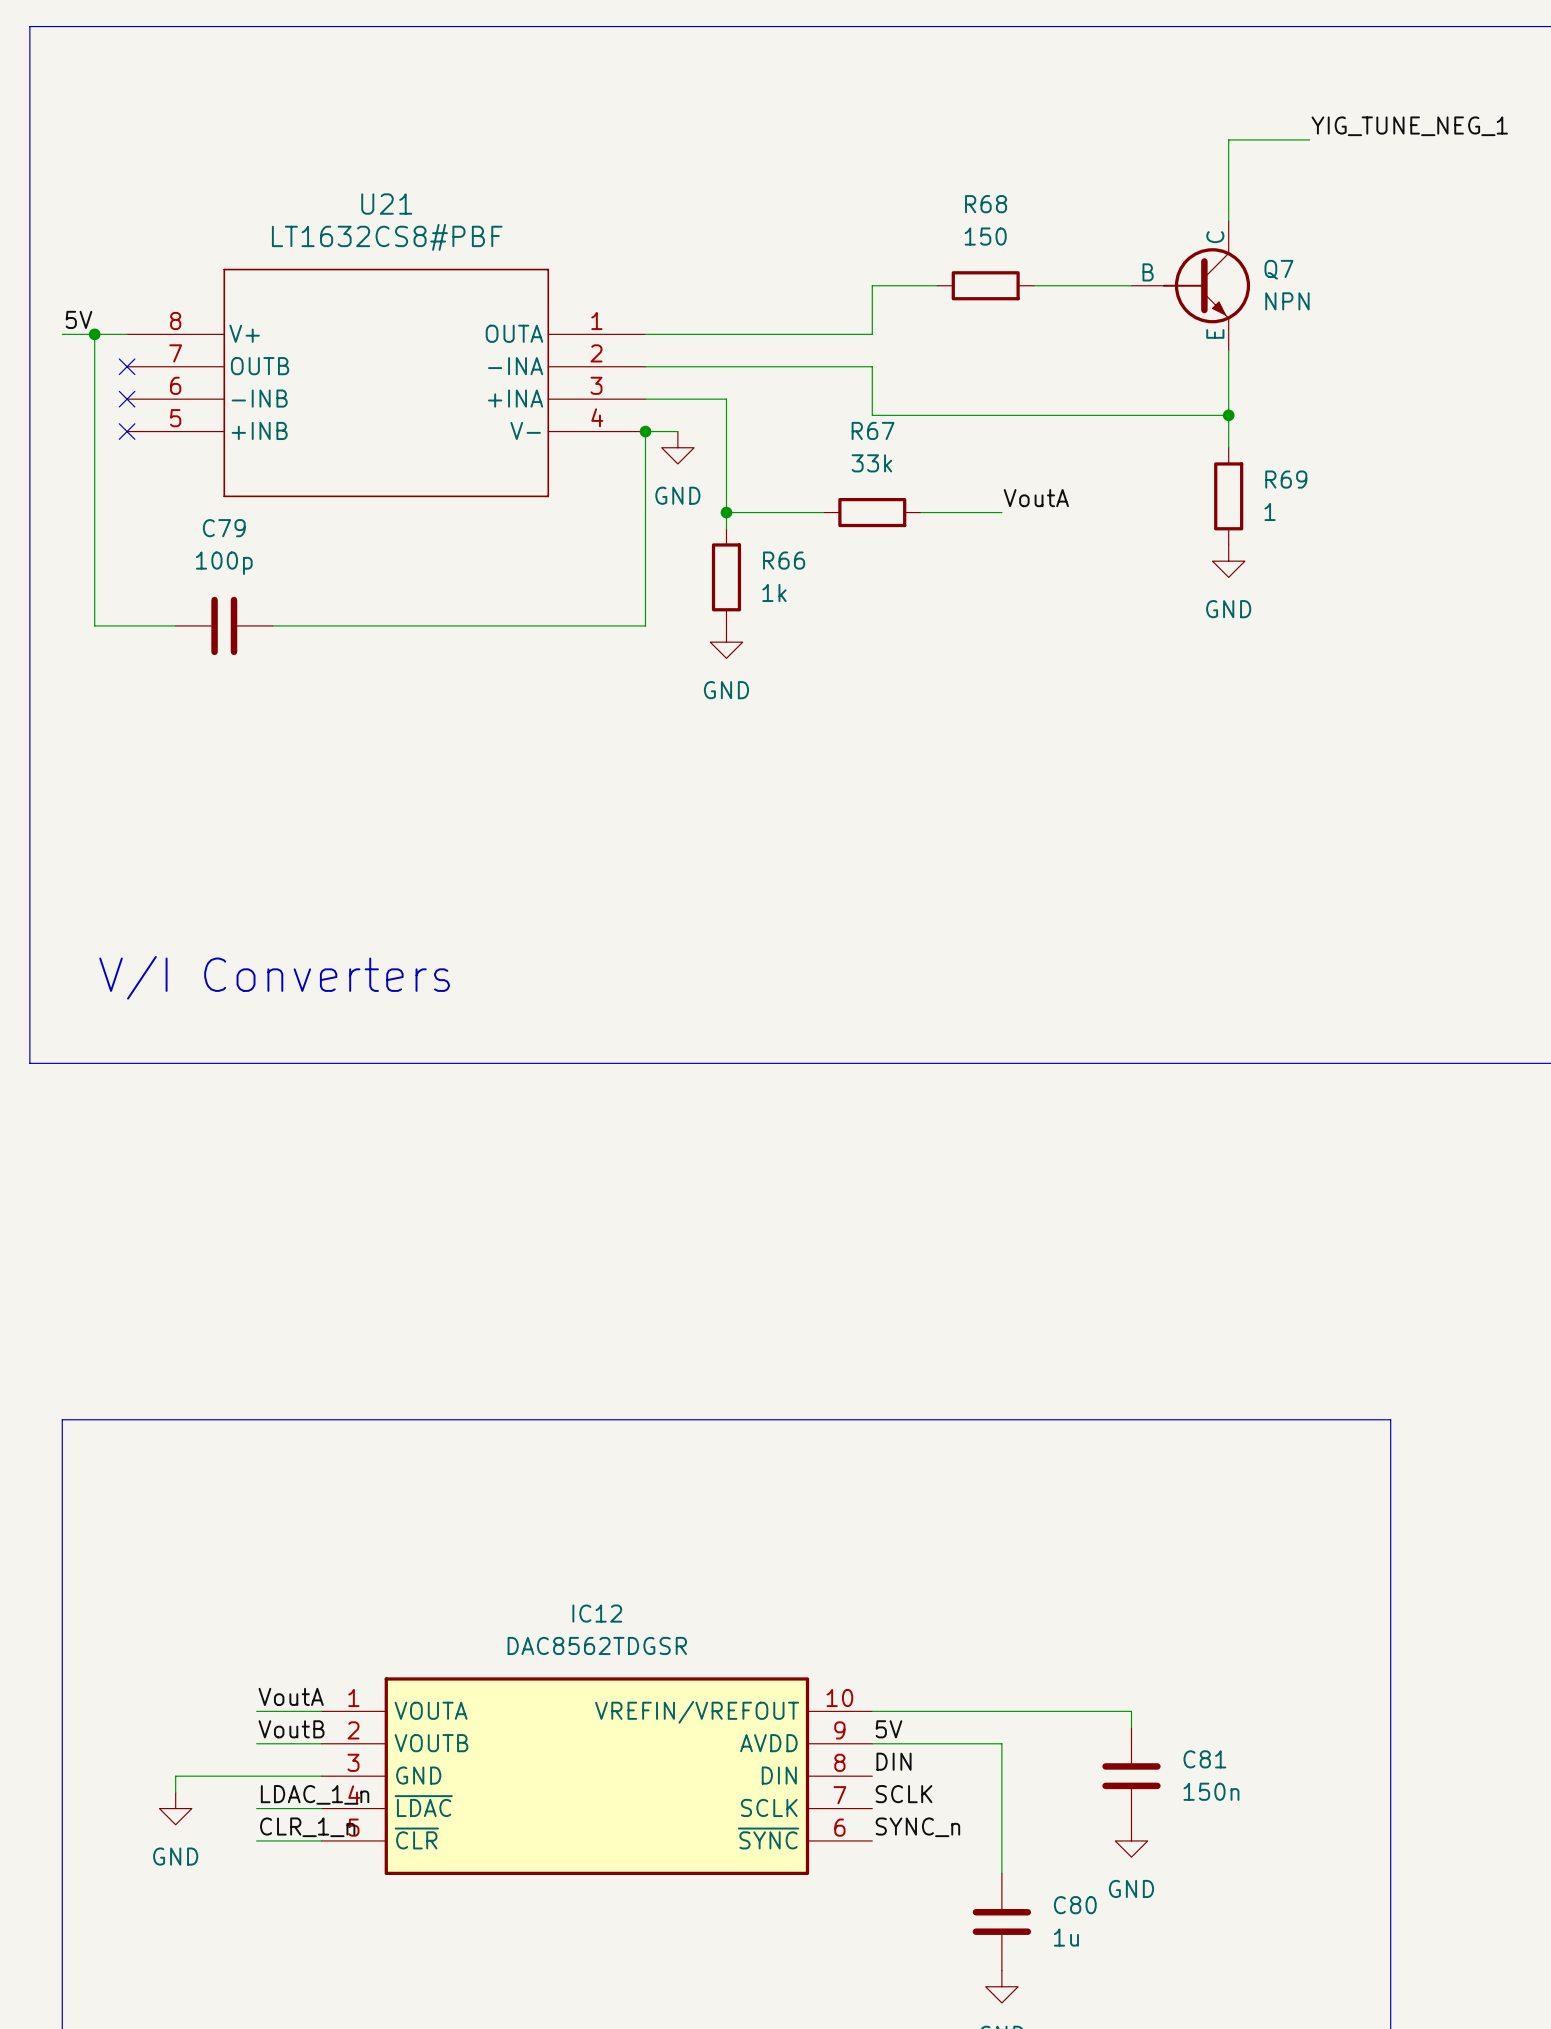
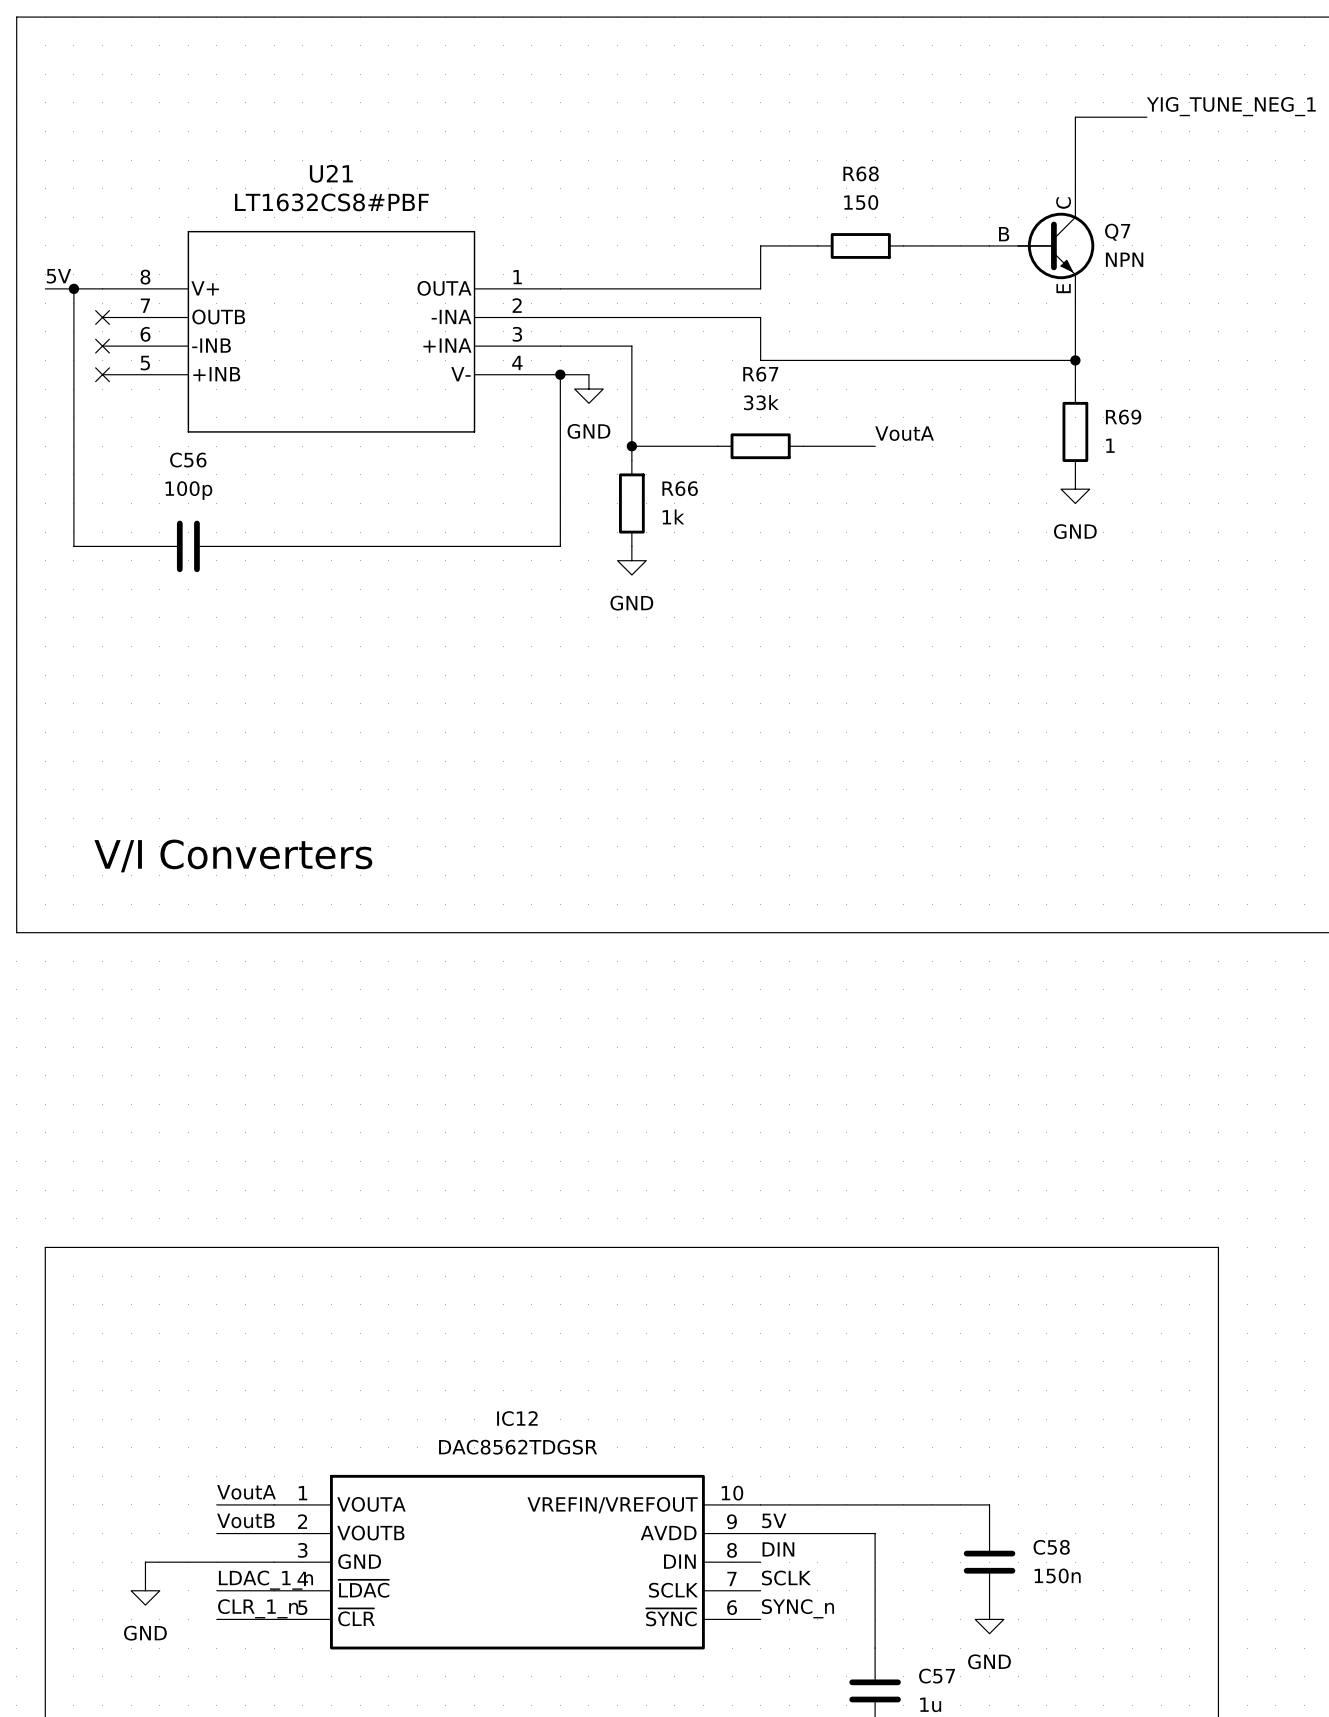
C79 name: C79 (224, 528) -> C56 (188, 460)
C81 name: C81 (1204, 1759) -> C58 (1051, 1547)
C80 name: C80 (1075, 1905) -> C57 (937, 1676)

